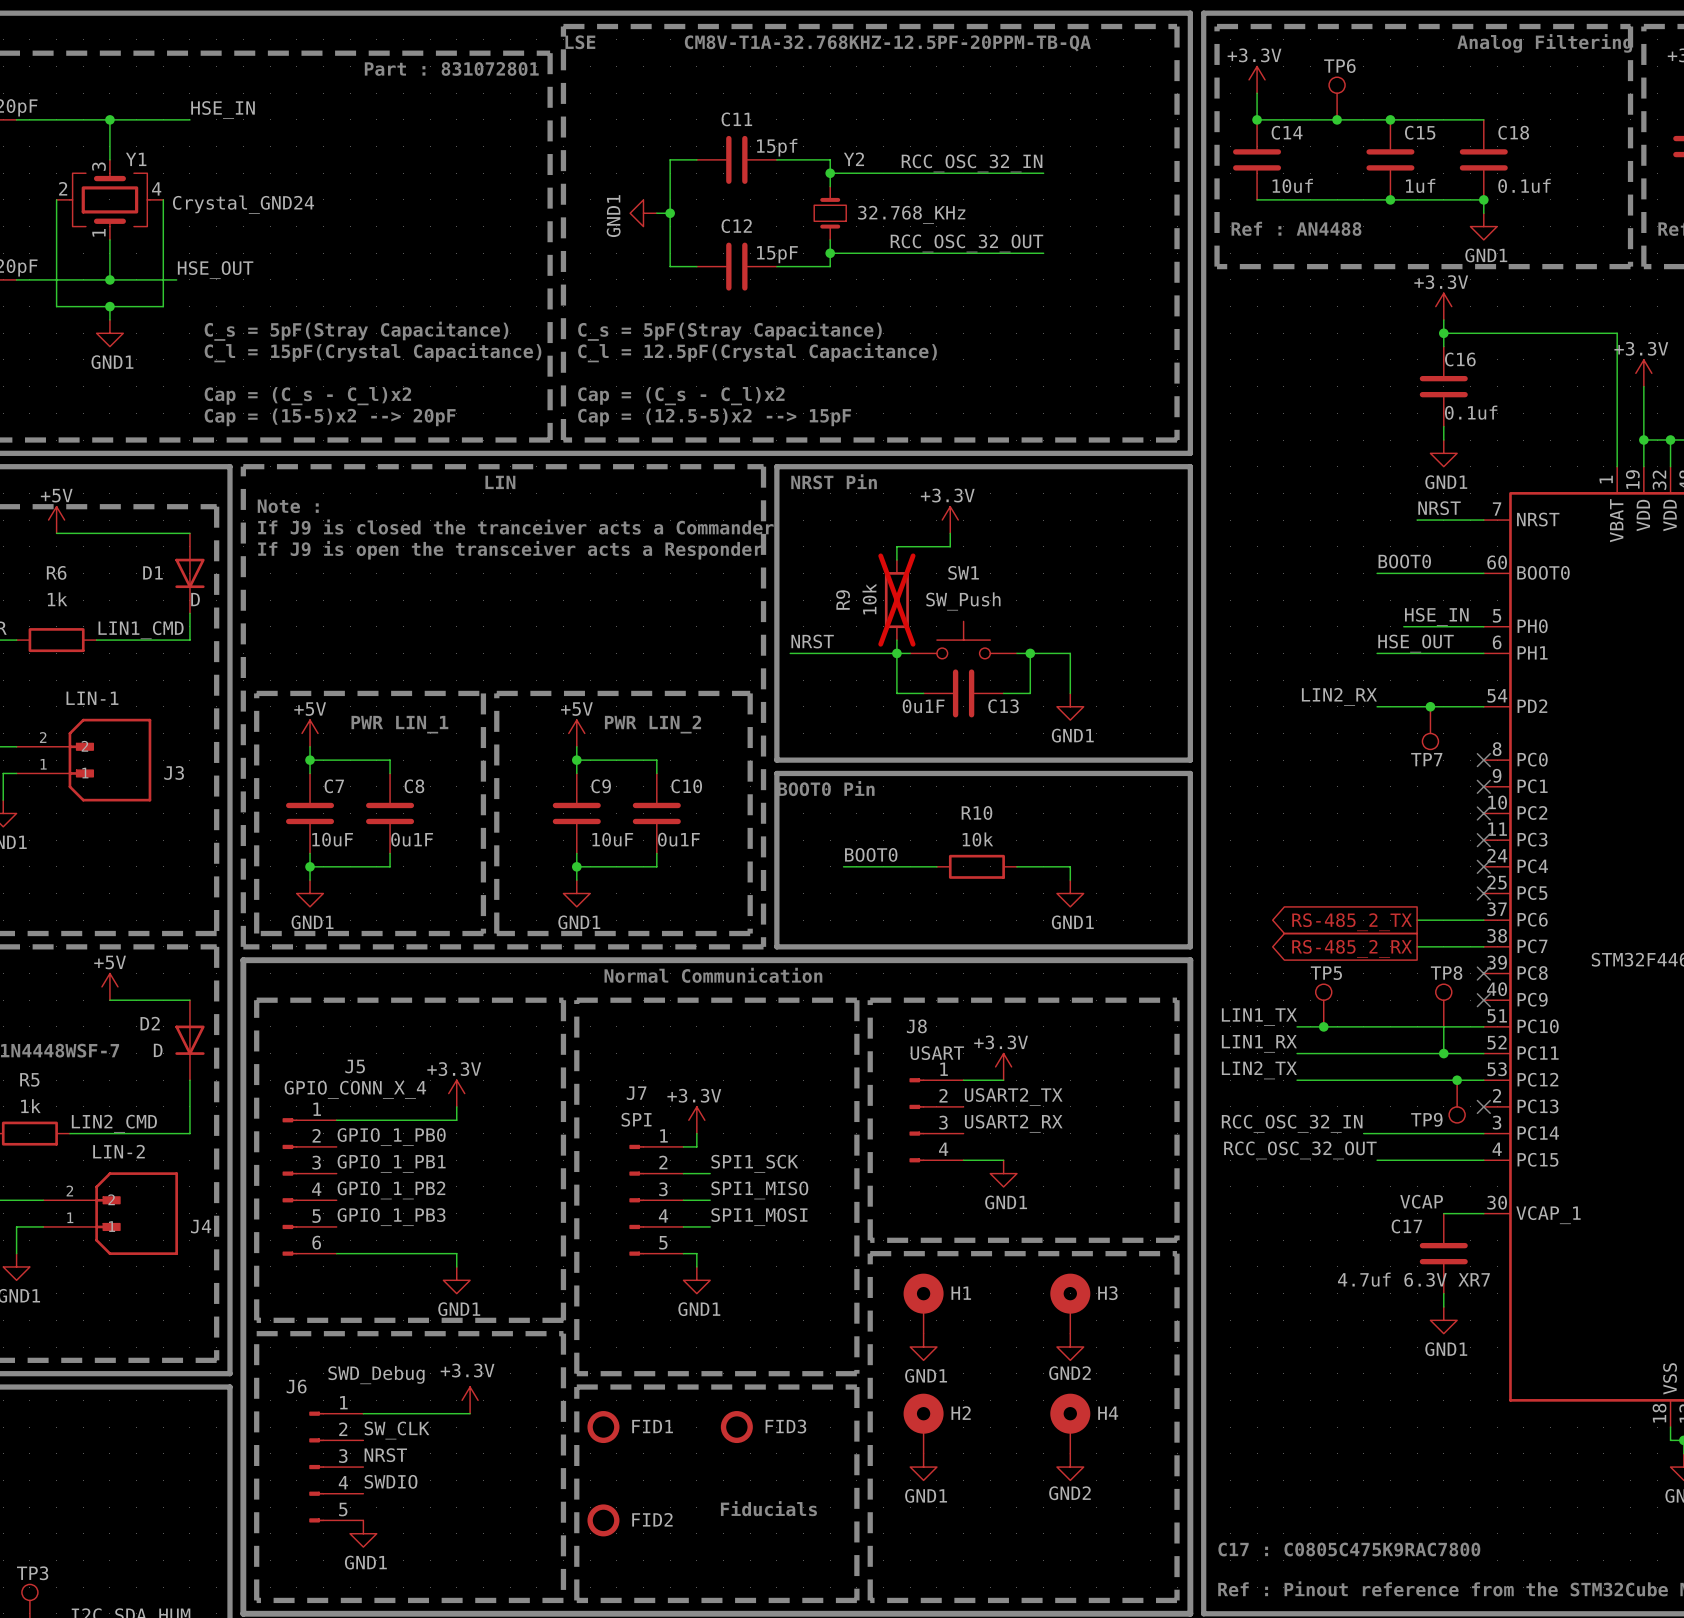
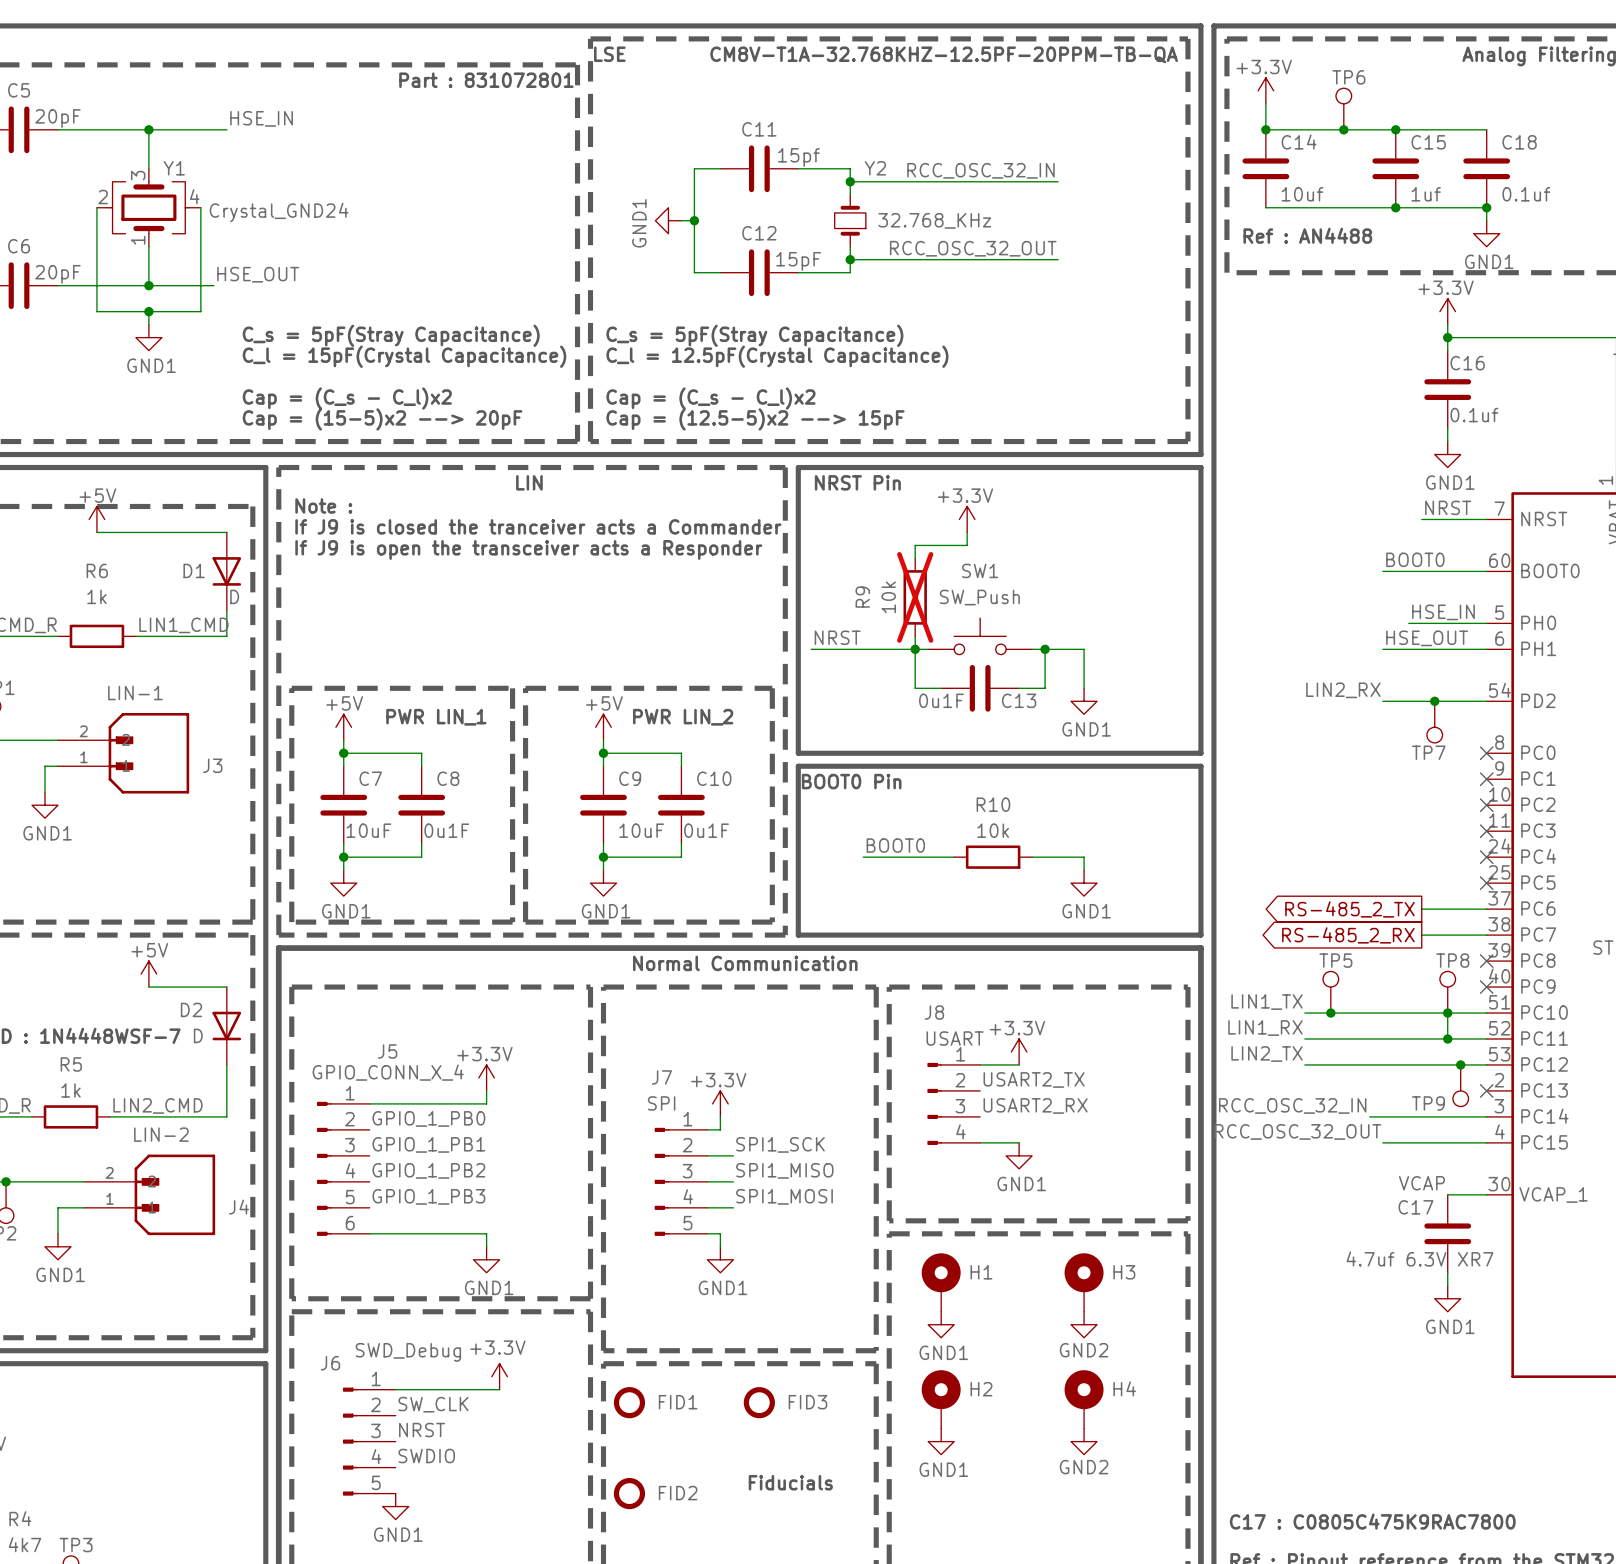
junction: none -> (1447, 1013)

